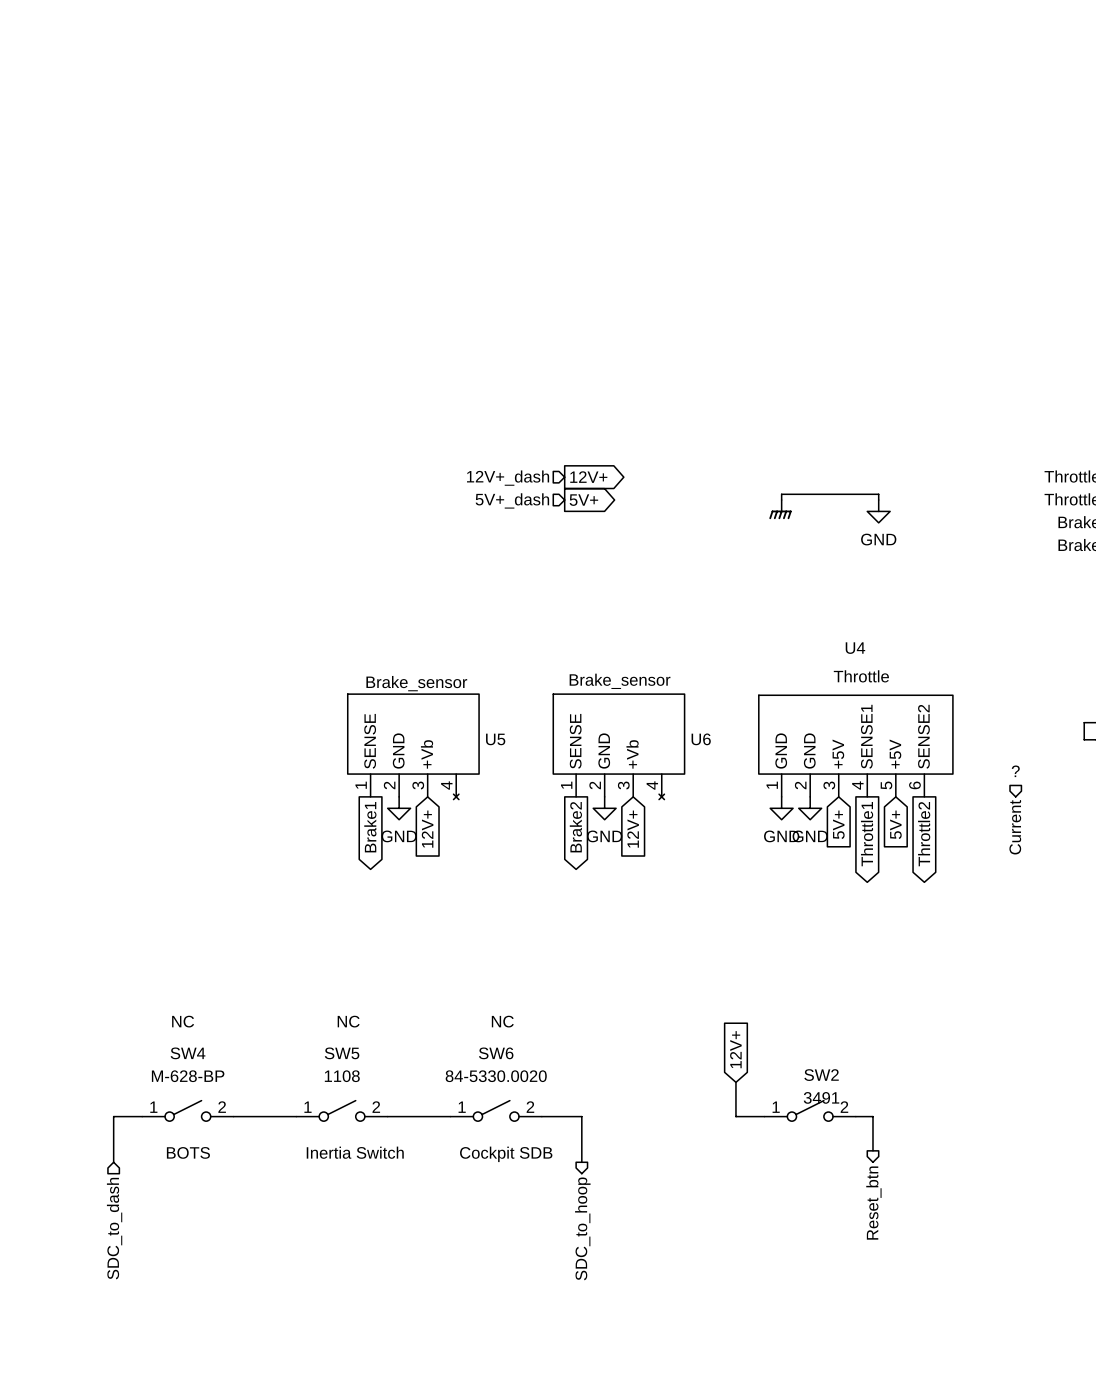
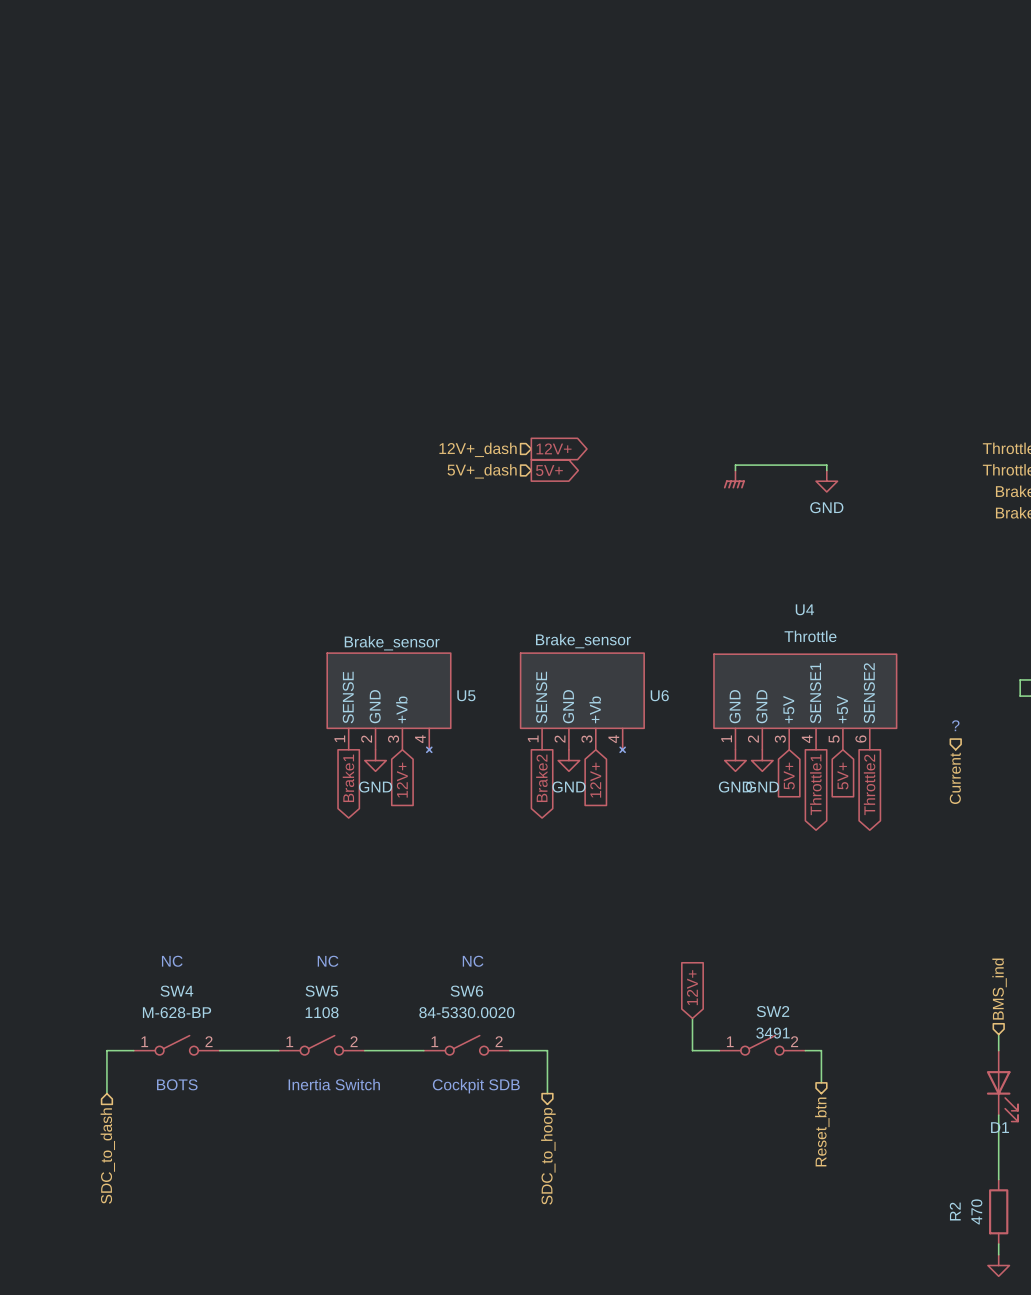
hierarchical label: none -> BMS_ind (999, 989)
wire: none -> (998, 1034) (998, 1050)
D1: none -> (1002, 1086)
wire: none -> (998, 1115) (998, 1179)
R2: none -> 470 (998, 1211)
wire: none -> (998, 1244) (998, 1254)
power symbol: none -> (998, 1265)

